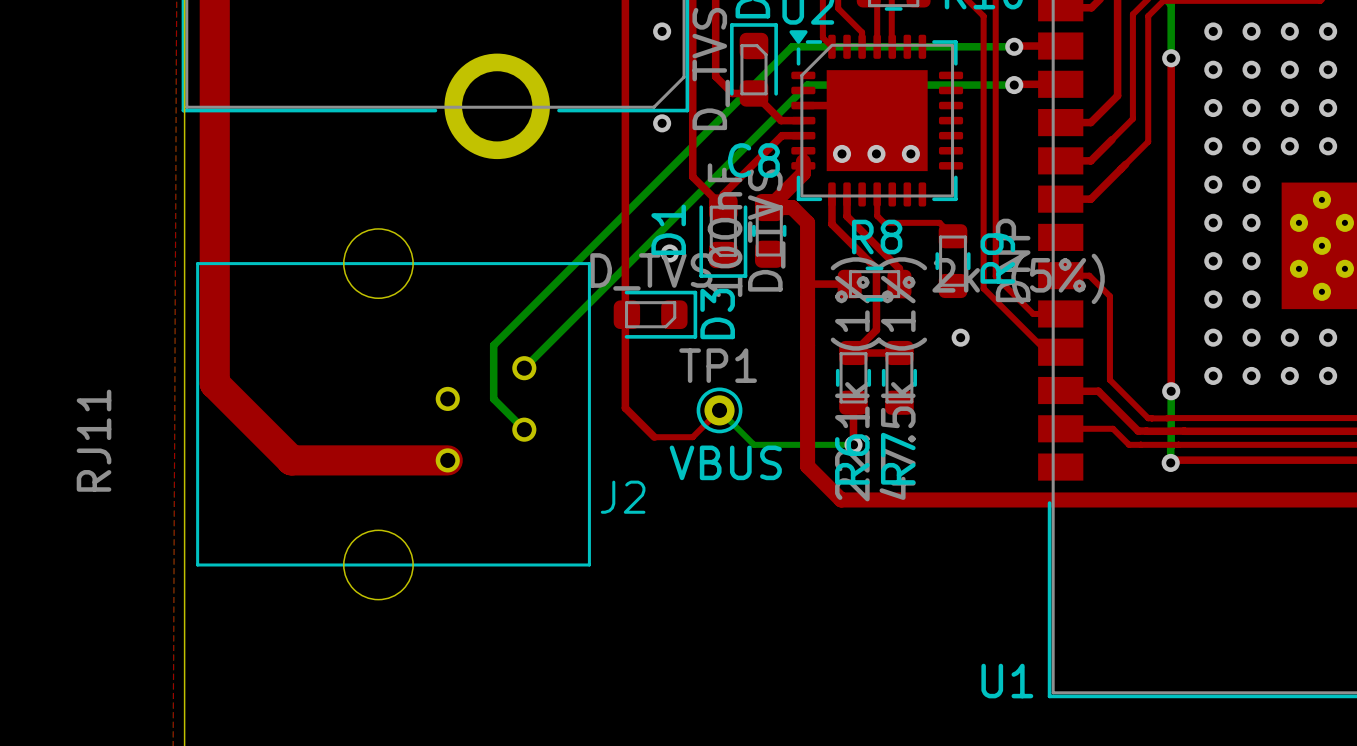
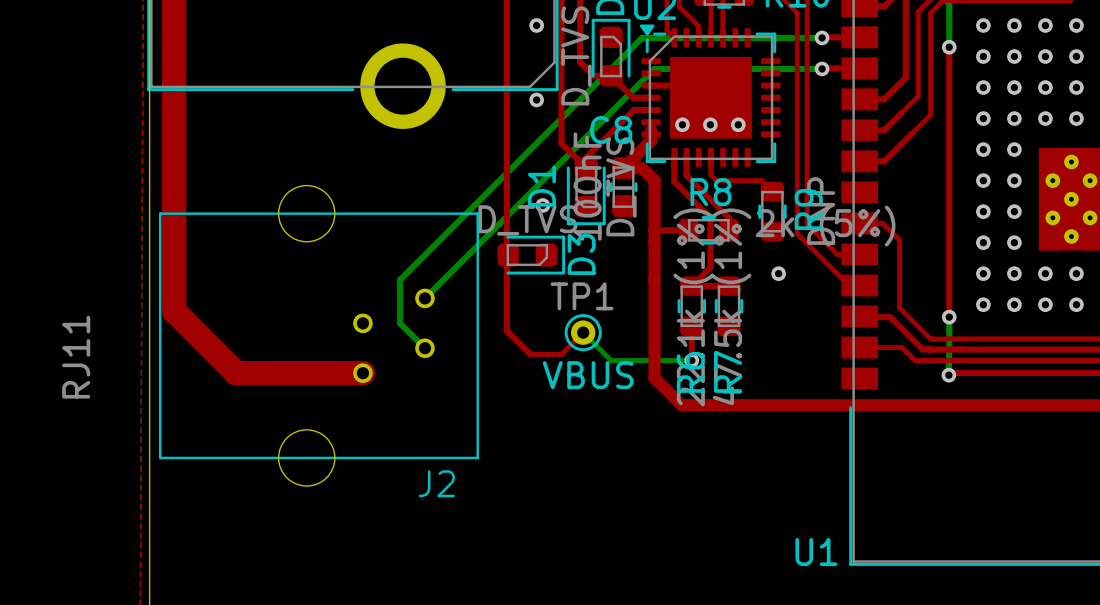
J2 name position: J2 (623, 497) -> J2 (436, 483)

